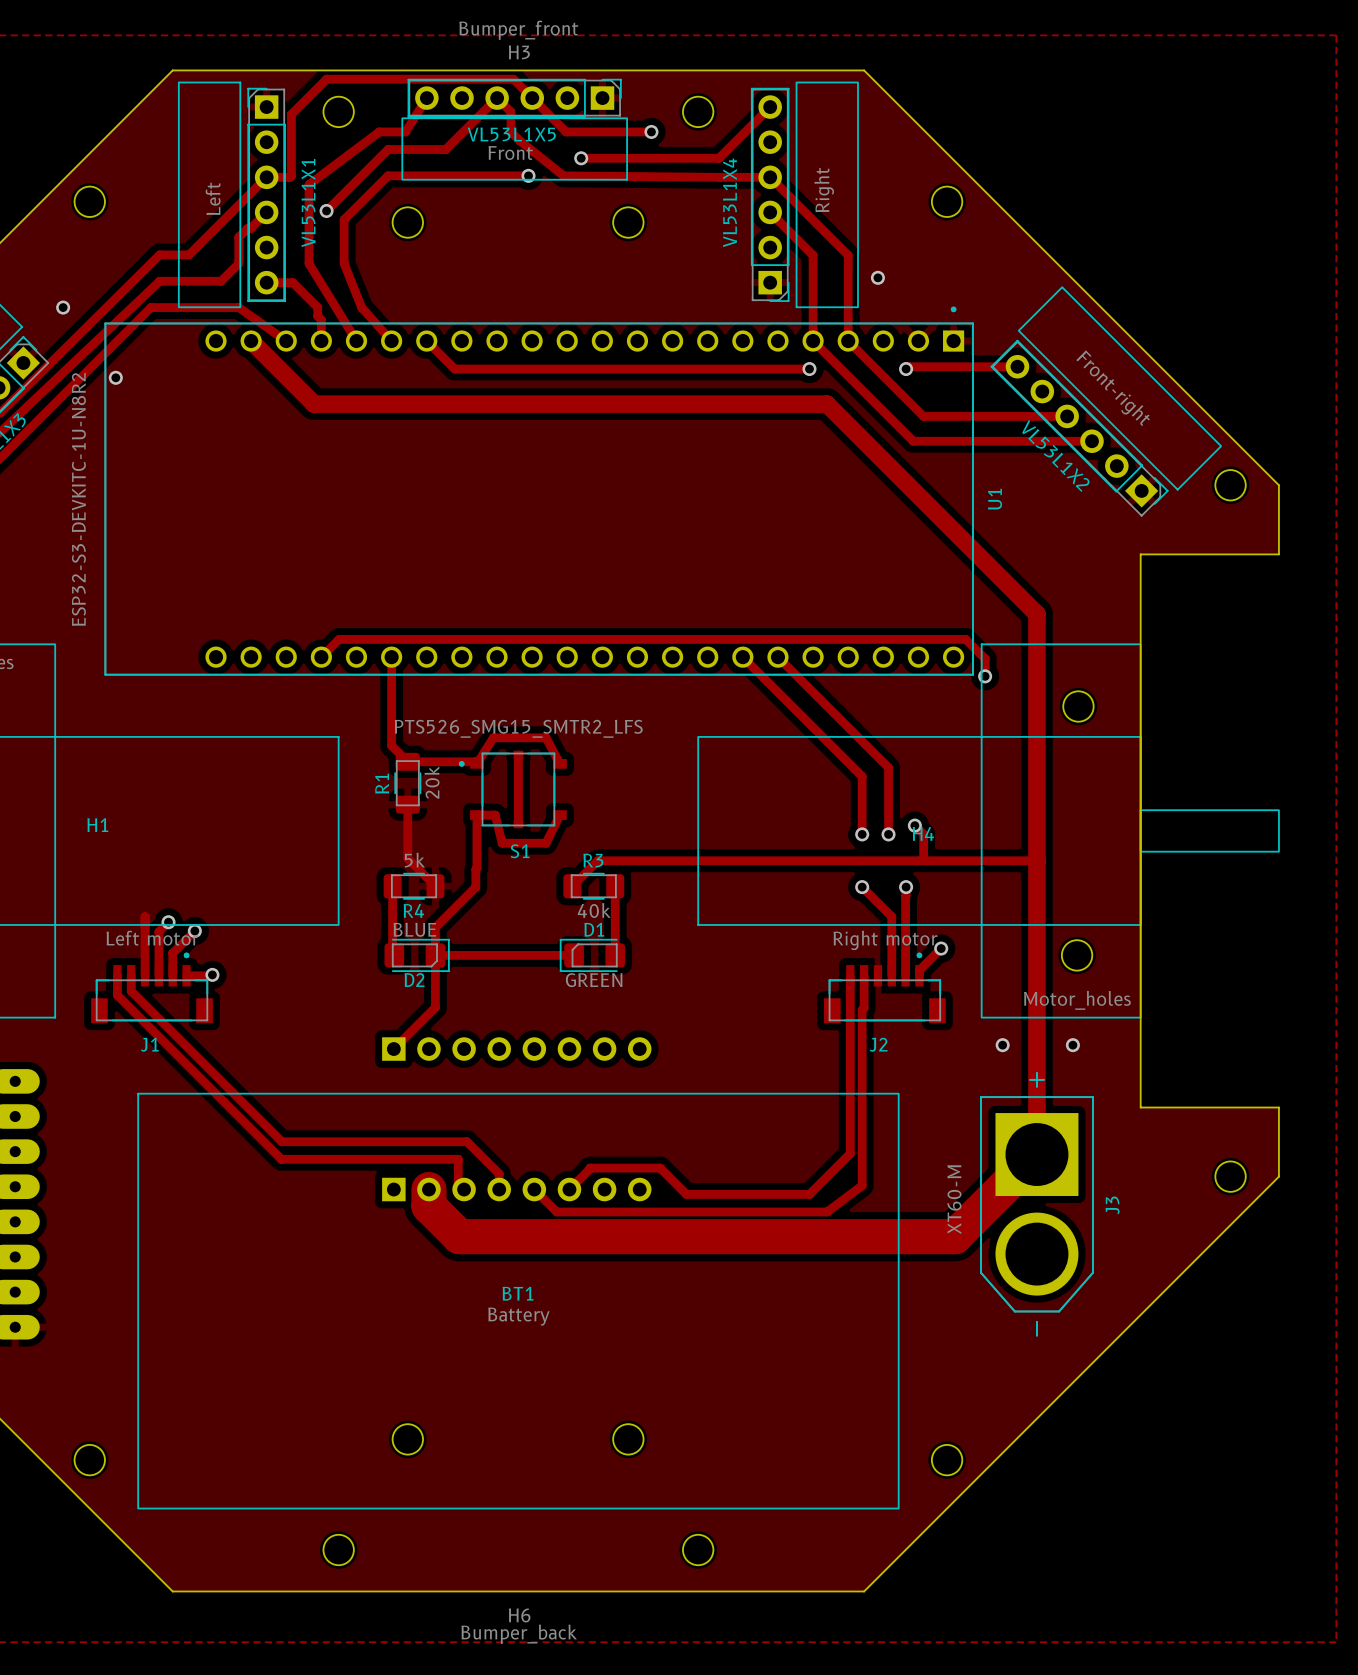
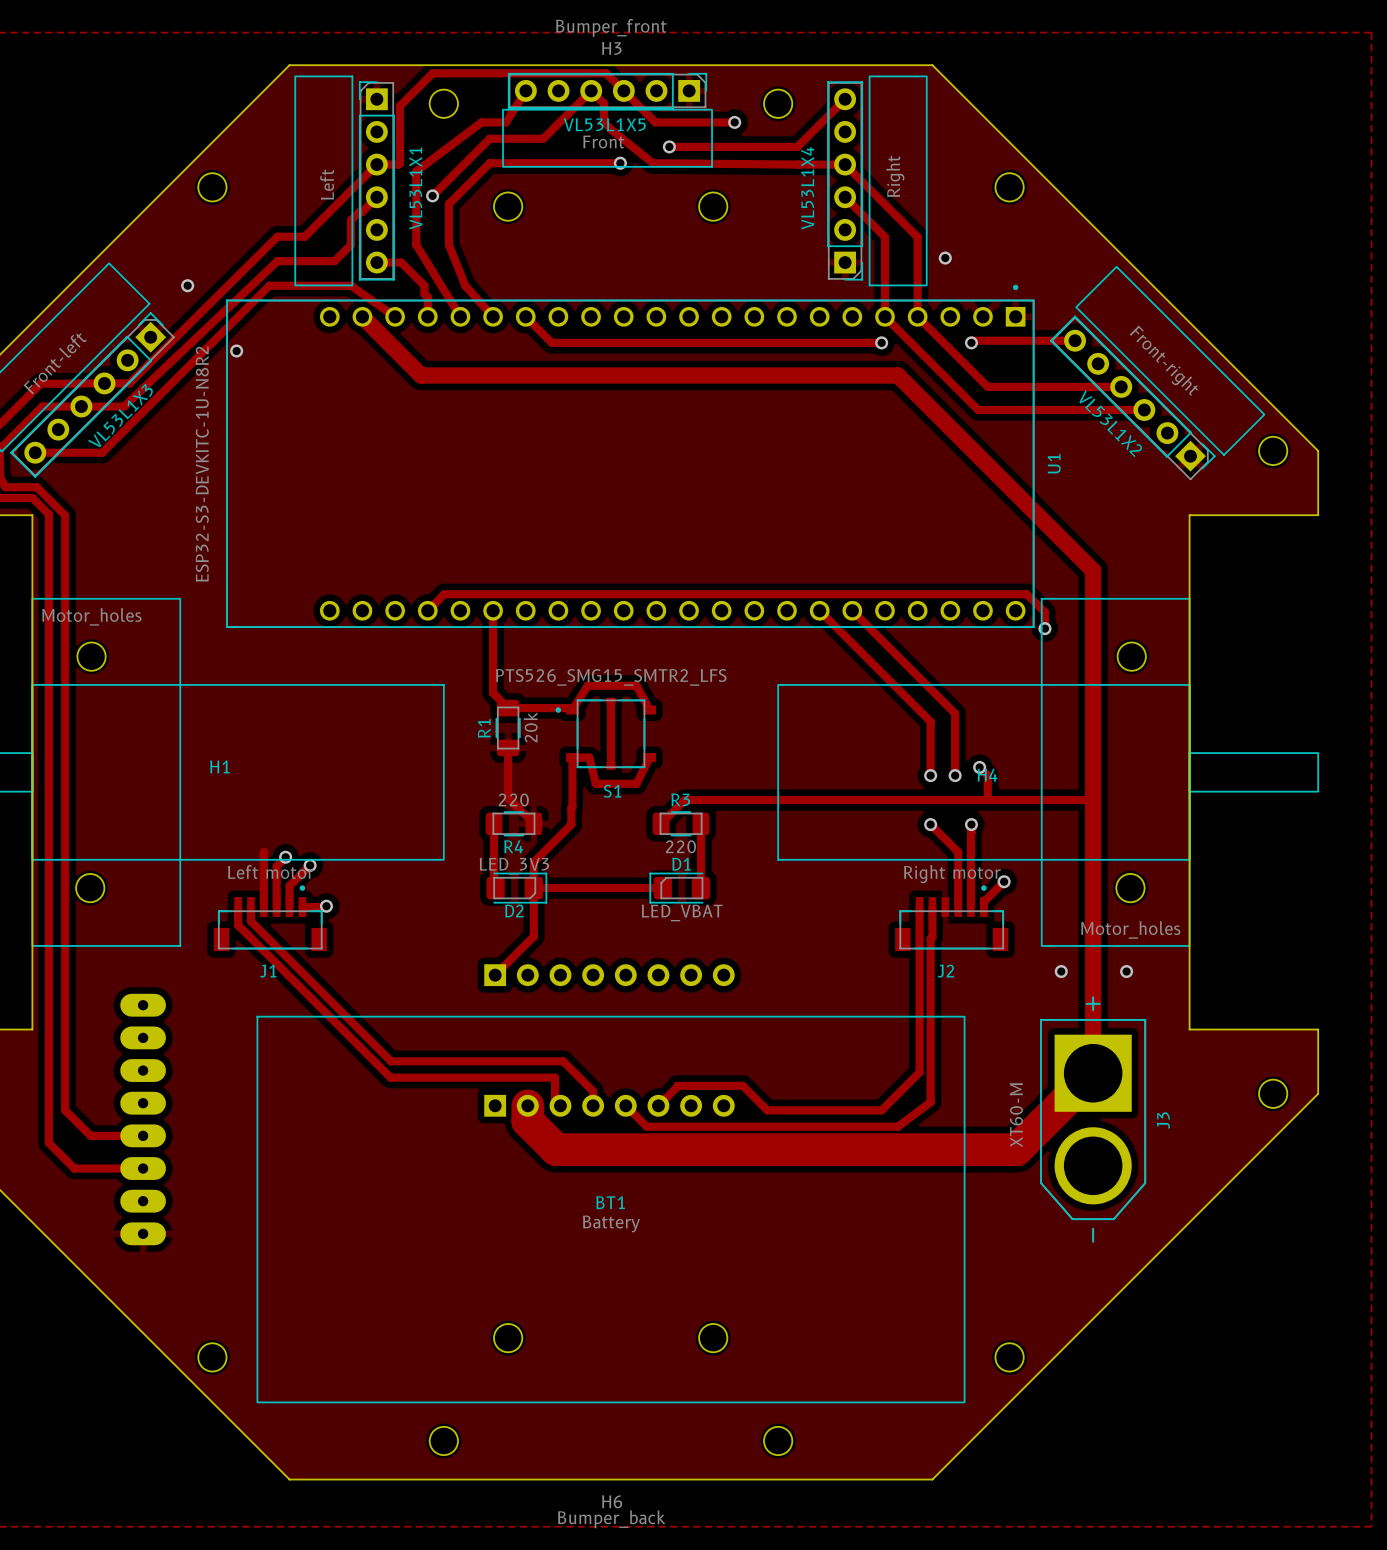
R4 value: 5k (414, 860) -> 220 (513, 800)
R3 value: 40k (594, 910) -> 220 (680, 846)
D2 value: BLUE (414, 929) -> LED_3V3 (514, 866)
D1 value: GREEN (594, 980) -> LED_VBAT (682, 912)

